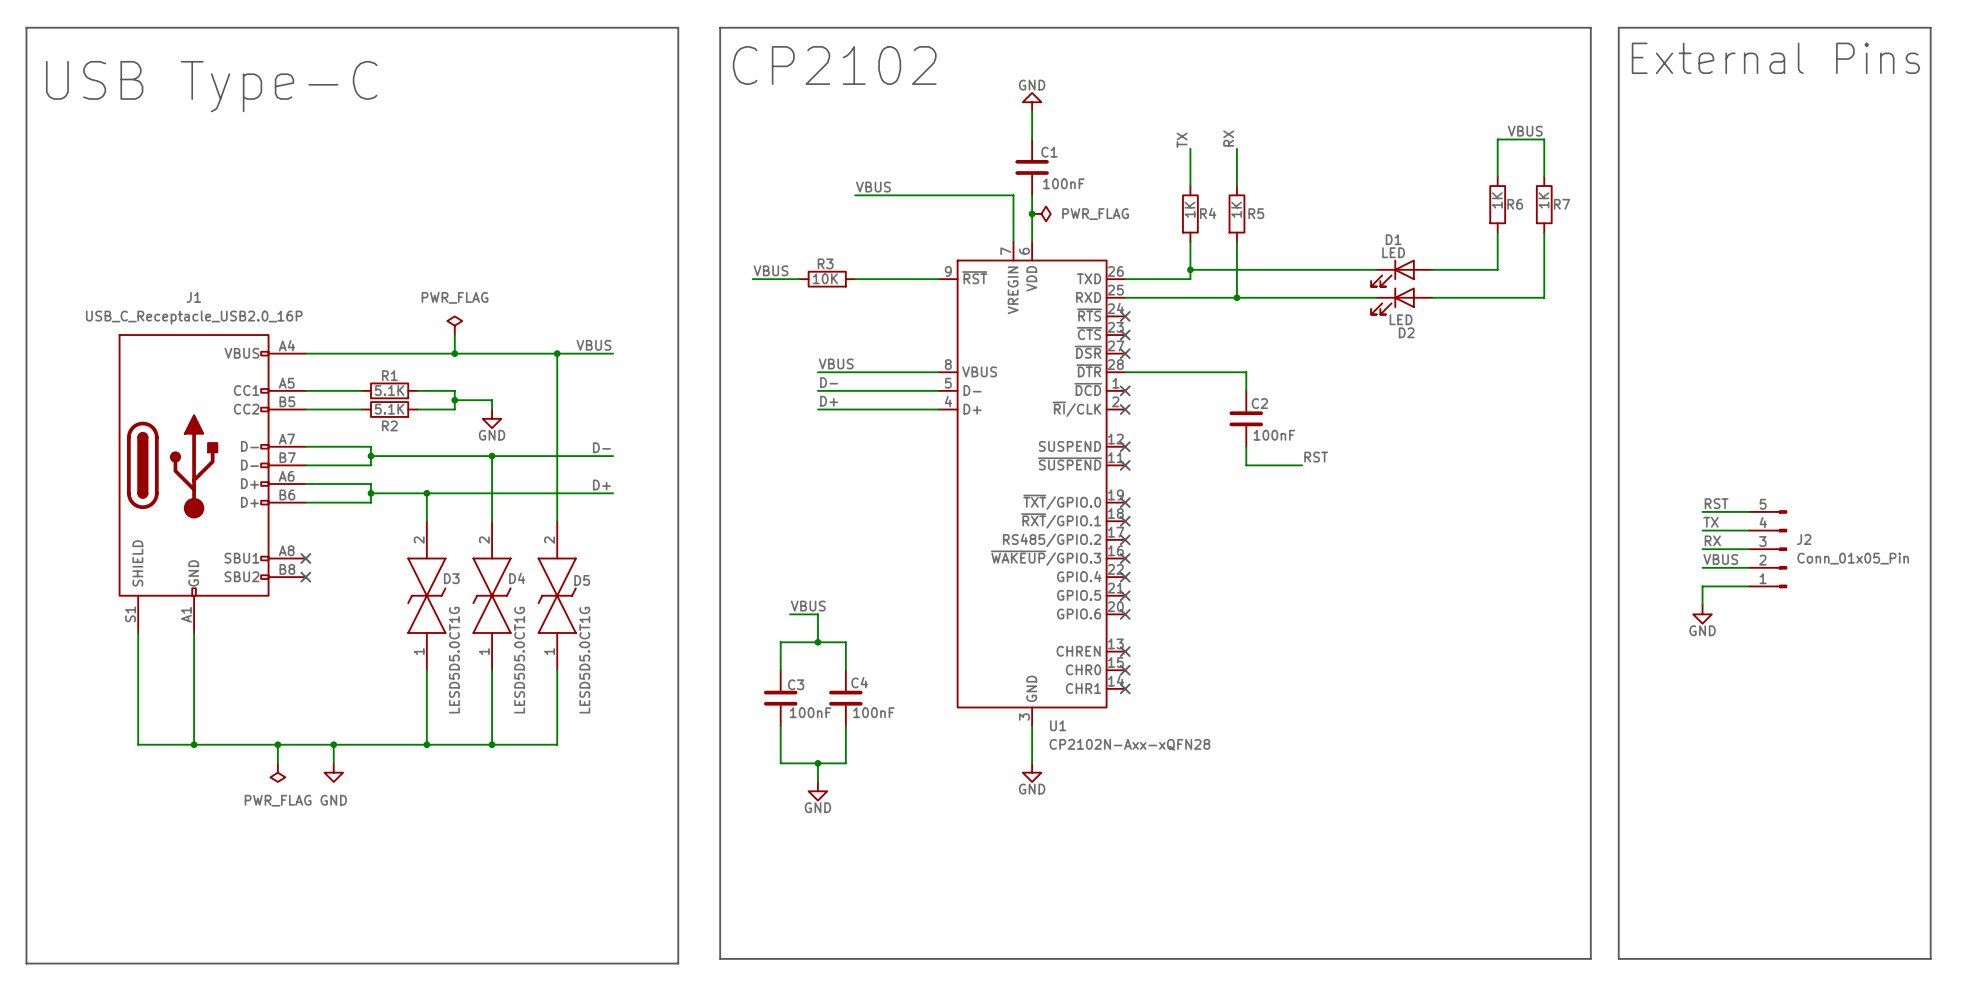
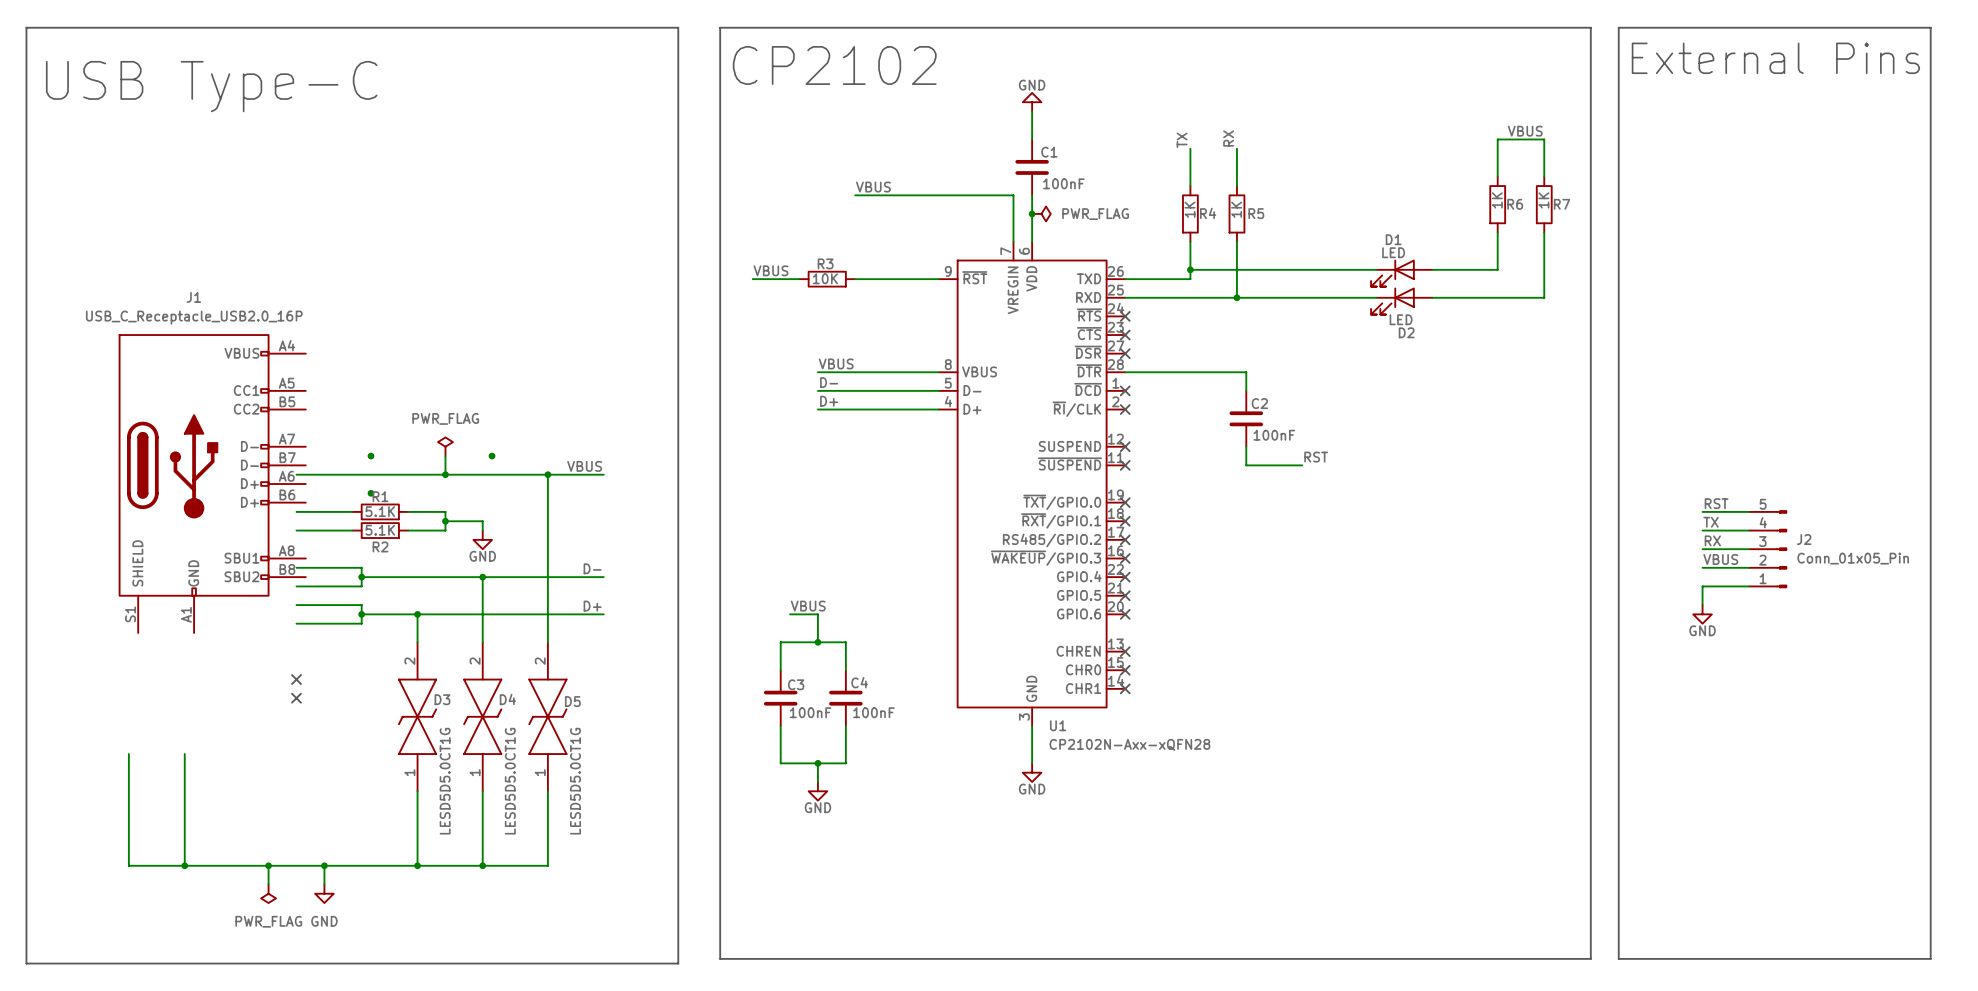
power symbol position: PWR_FLAG (454, 325) -> PWR_FLAG (445, 446)
wire: (454, 335) (454, 353) -> (445, 456) (445, 474)
label position: VBUS (593, 345) -> VBUS (584, 466)
wire: (305, 353) (613, 353) -> (296, 474) (603, 474)
junction: (454, 353) -> none
wire: (557, 353) (557, 521) -> (547, 474) (547, 642)
junction: (557, 353) -> none
wire: (305, 390) (361, 390) -> (296, 511) (352, 511)
R1 position: (389, 390) -> (380, 511)
wire: (417, 390) (454, 390) (454, 409) (417, 409) -> (408, 511) (445, 511) (445, 530) (408, 530)
wire: (454, 400) (492, 400) (492, 409) -> (445, 521) (482, 521) (482, 530)
junction: (454, 400) -> none
wire: (305, 409) (361, 409) -> (296, 530) (352, 530)
R2 position: (389, 409) -> (380, 530)
power symbol position: GND (492, 418) -> GND (482, 539)
wire: (305, 446) (370, 446) (370, 465) (305, 465) -> (296, 567) (361, 567) (361, 586) (296, 586)
label position: D- (601, 447) -> D- (592, 568)
wire: (370, 456) (613, 456) -> (361, 577) (603, 577)
wire: (492, 456) (492, 521) -> (482, 577) (482, 642)
junction: none -> (445, 474)
junction: none -> (547, 474)
wire: (305, 484) (370, 484) (370, 502) (305, 502) -> (296, 605) (361, 605) (361, 623) (296, 623)
label position: D+ (601, 485) -> D+ (592, 606)
wire: (370, 493) (613, 493) -> (361, 614) (603, 614)
wire: (426, 493) (426, 521) -> (417, 614) (417, 642)
junction: (426, 493) -> none
junction: none -> (445, 521)
no-connect mark: (305, 558) -> none
no-connect mark: (305, 577) -> none
junction: none -> (361, 577)
junction: none -> (482, 577)
D3 position: (426, 595) -> (417, 716)
D4 position: (492, 595) -> (482, 716)
D5 position: (557, 595) -> (547, 716)
junction: none -> (361, 614)
junction: none -> (417, 614)
wire: (138, 632) (138, 744) (557, 744) (557, 670) -> (128, 754) (128, 865) (547, 865) (547, 791)
wire: (194, 632) (194, 744) -> (184, 754) (184, 865)
wire: (426, 670) (426, 744) -> (417, 791) (417, 865)
wire: (492, 670) (492, 744) -> (482, 791) (482, 865)
no-connect mark: none -> (296, 679)
no-connect mark: none -> (296, 698)
junction: (194, 744) -> none
wire: (277, 744) (277, 763) -> (268, 865) (268, 884)
junction: (277, 744) -> none
wire: (333, 744) (333, 763) -> (324, 865) (324, 884)
junction: (333, 744) -> none
junction: (426, 744) -> none
junction: (492, 744) -> none
power symbol position: PWR_FLAG (277, 772) -> PWR_FLAG (268, 893)
power symbol position: GND (333, 772) -> GND (324, 893)
junction: none -> (184, 865)
junction: none -> (268, 865)
junction: none -> (324, 865)
junction: none -> (417, 865)
junction: none -> (482, 865)

